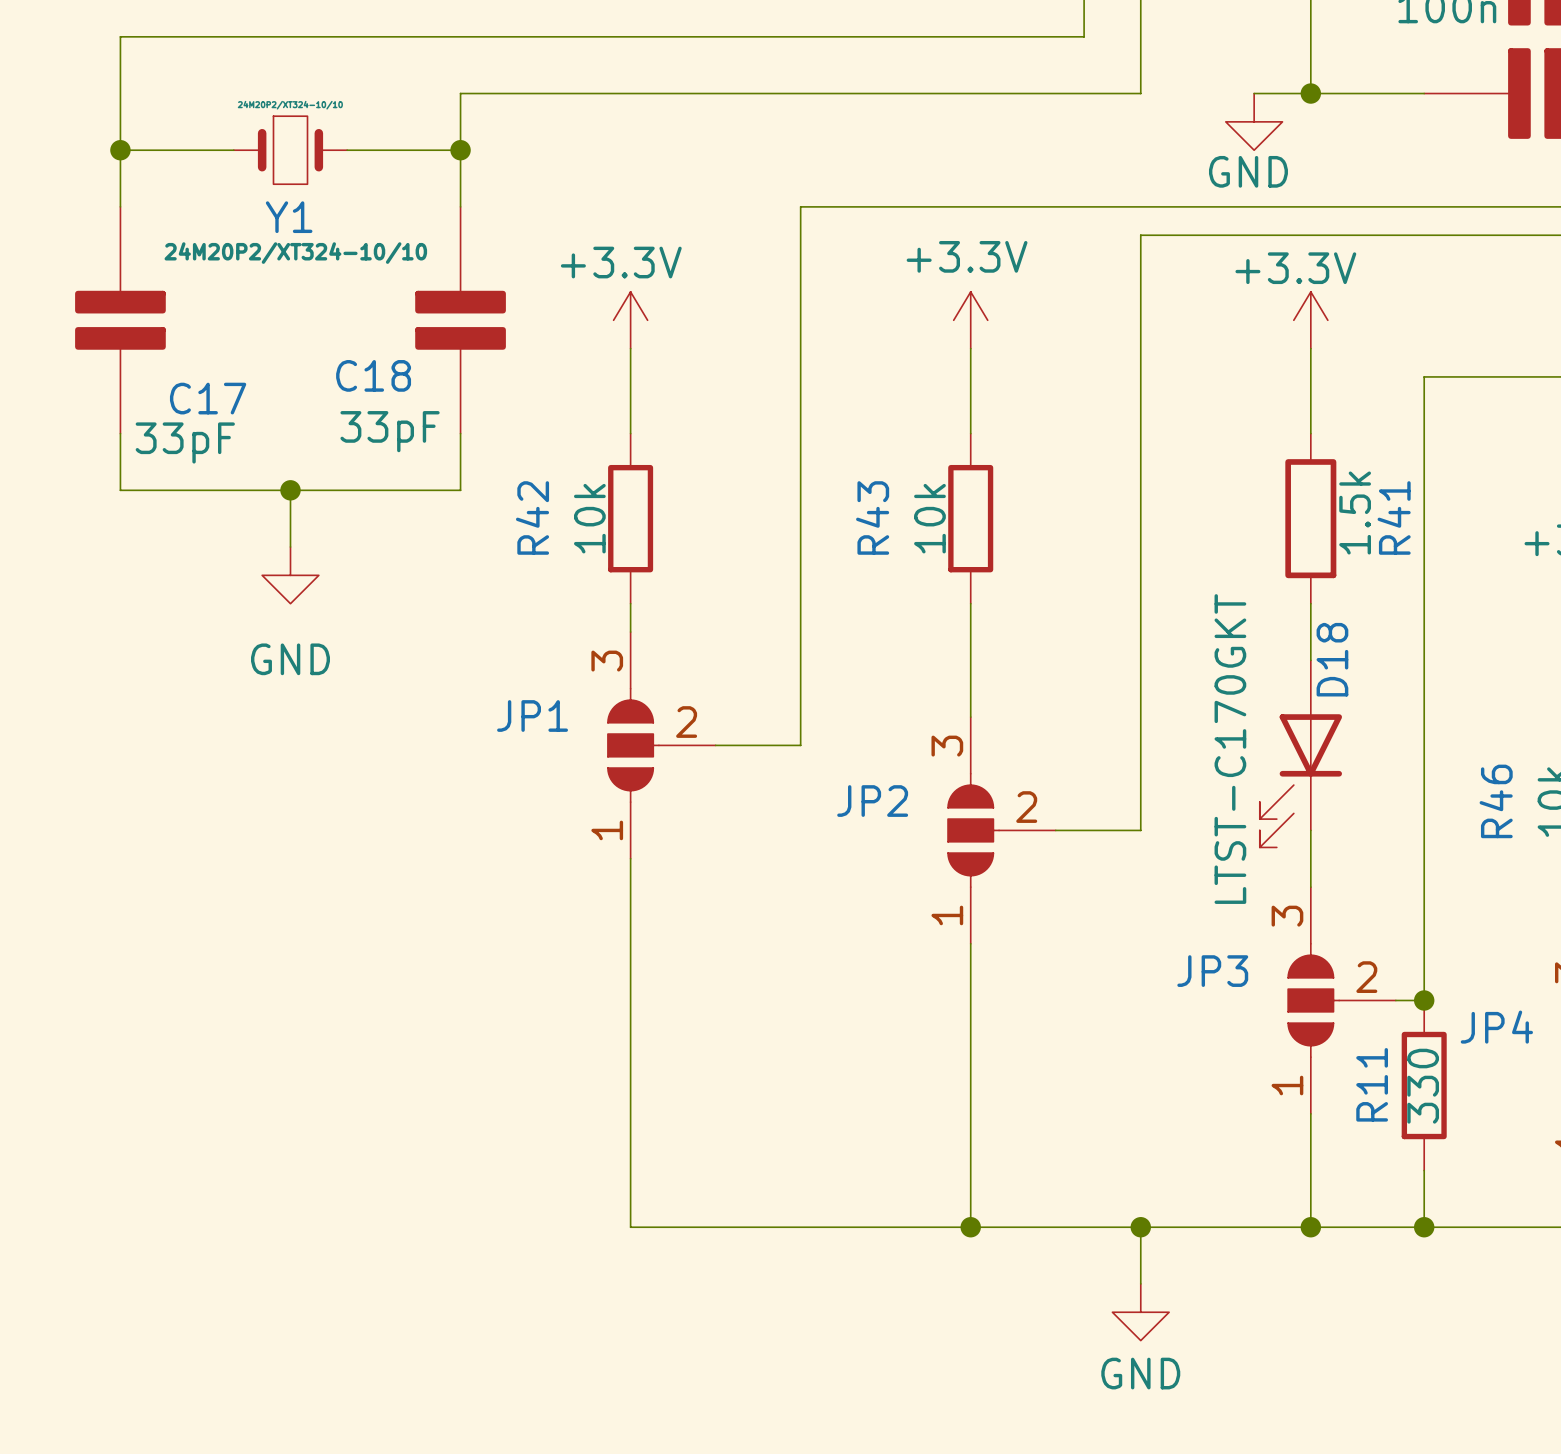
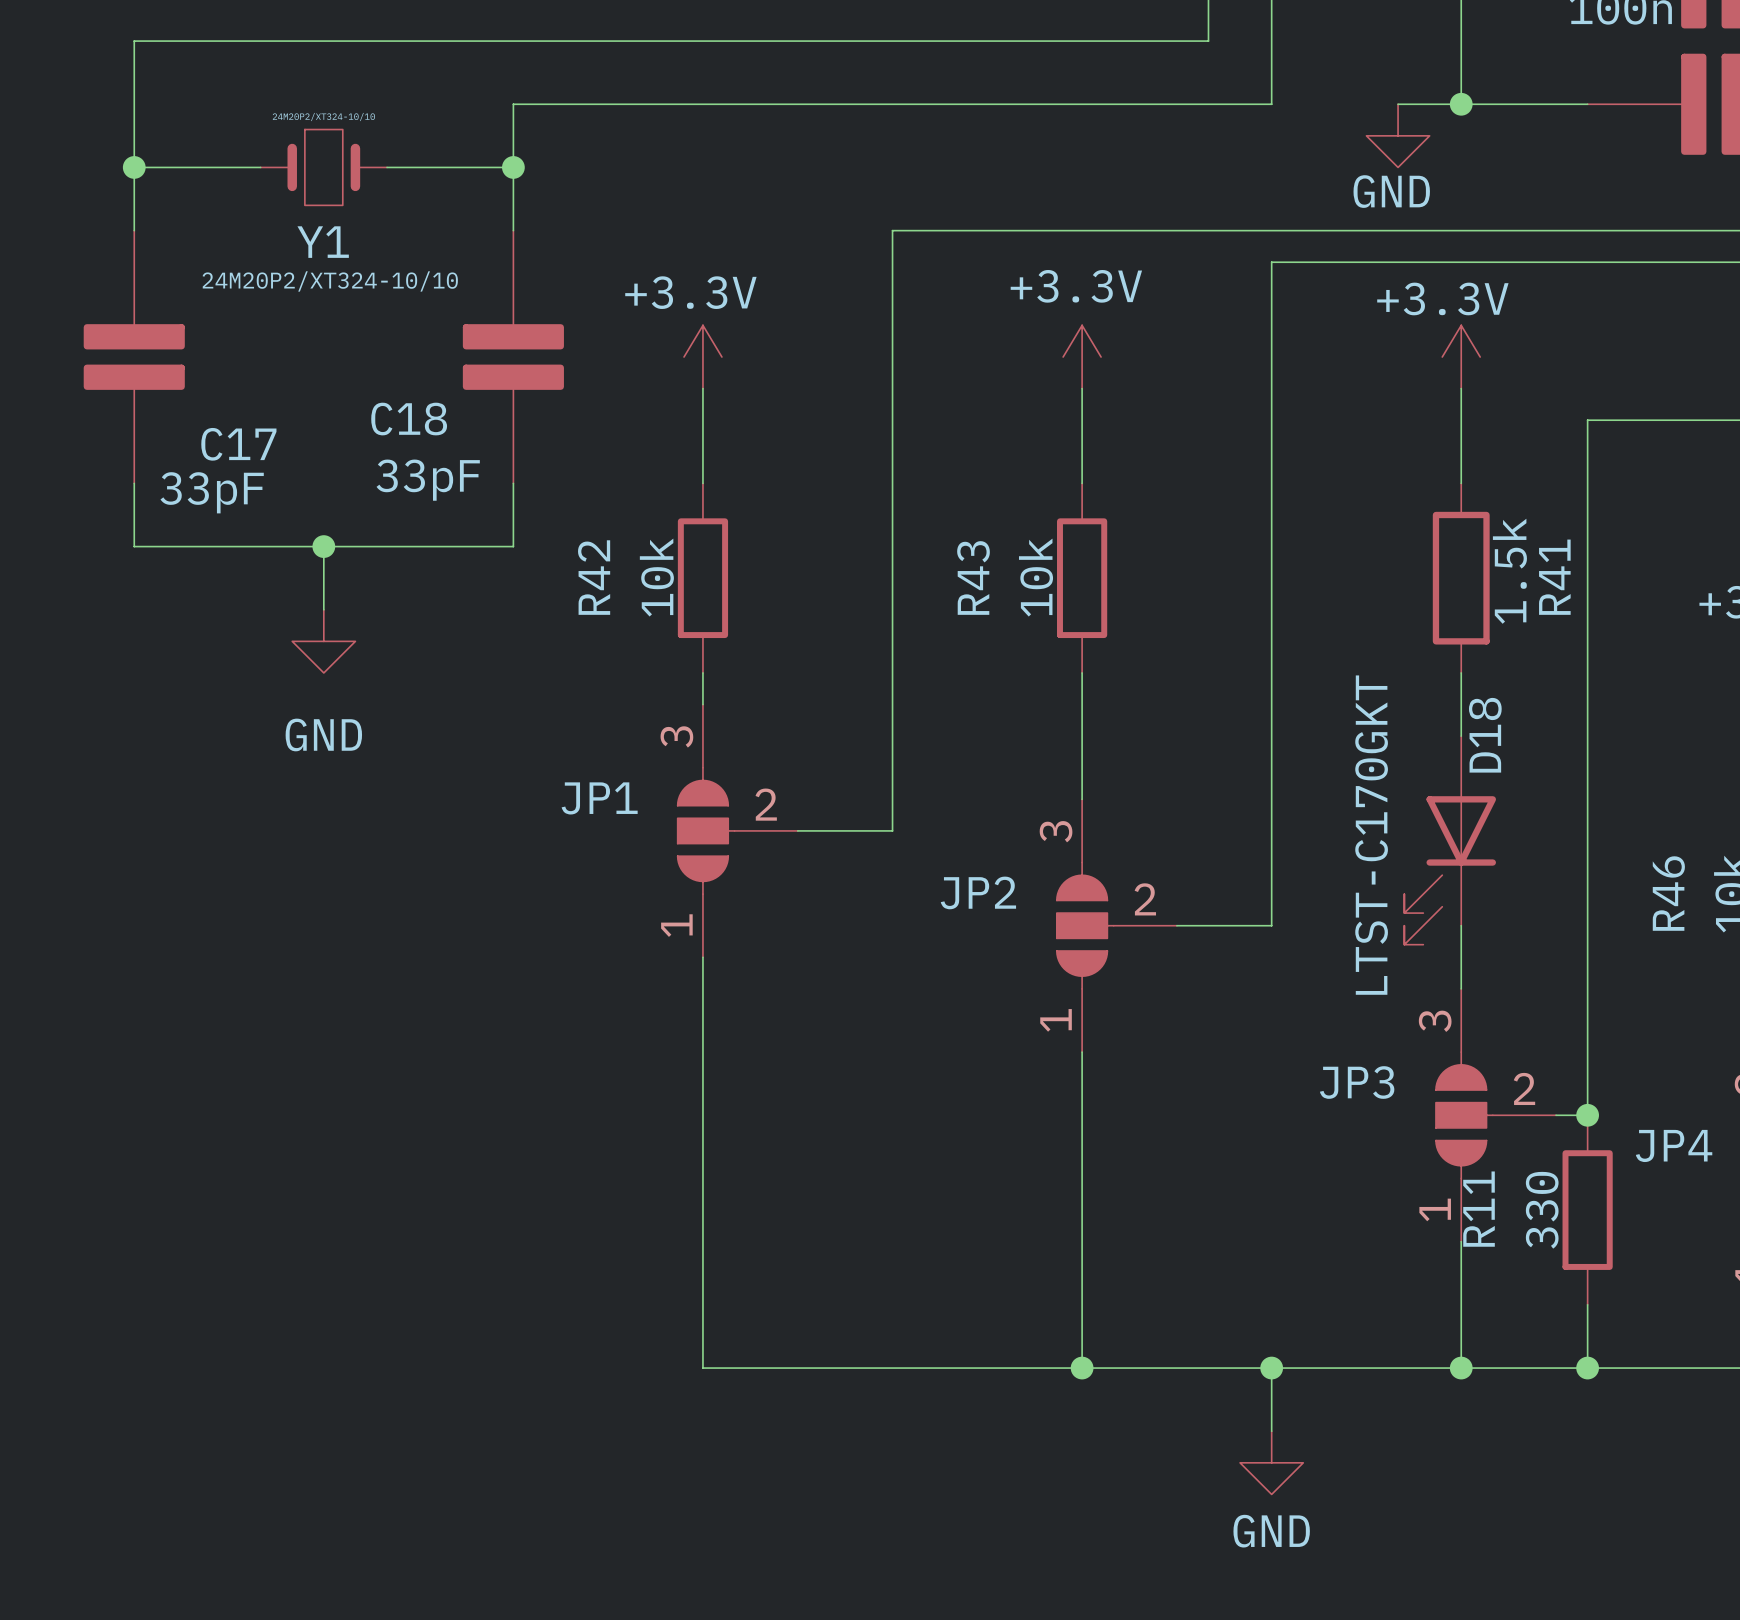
R11 name position: R11 (1372, 1084) -> R11 (1479, 1209)
R11 value position: 330 (1423, 1086) -> 330 (1542, 1210)

